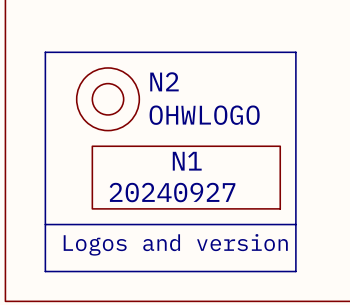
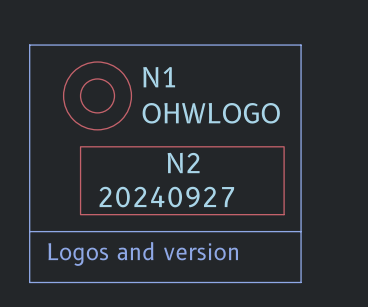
N2 name: N2 (164, 81) -> N1 (159, 77)
N1 name: N1 (187, 161) -> N2 (183, 163)

